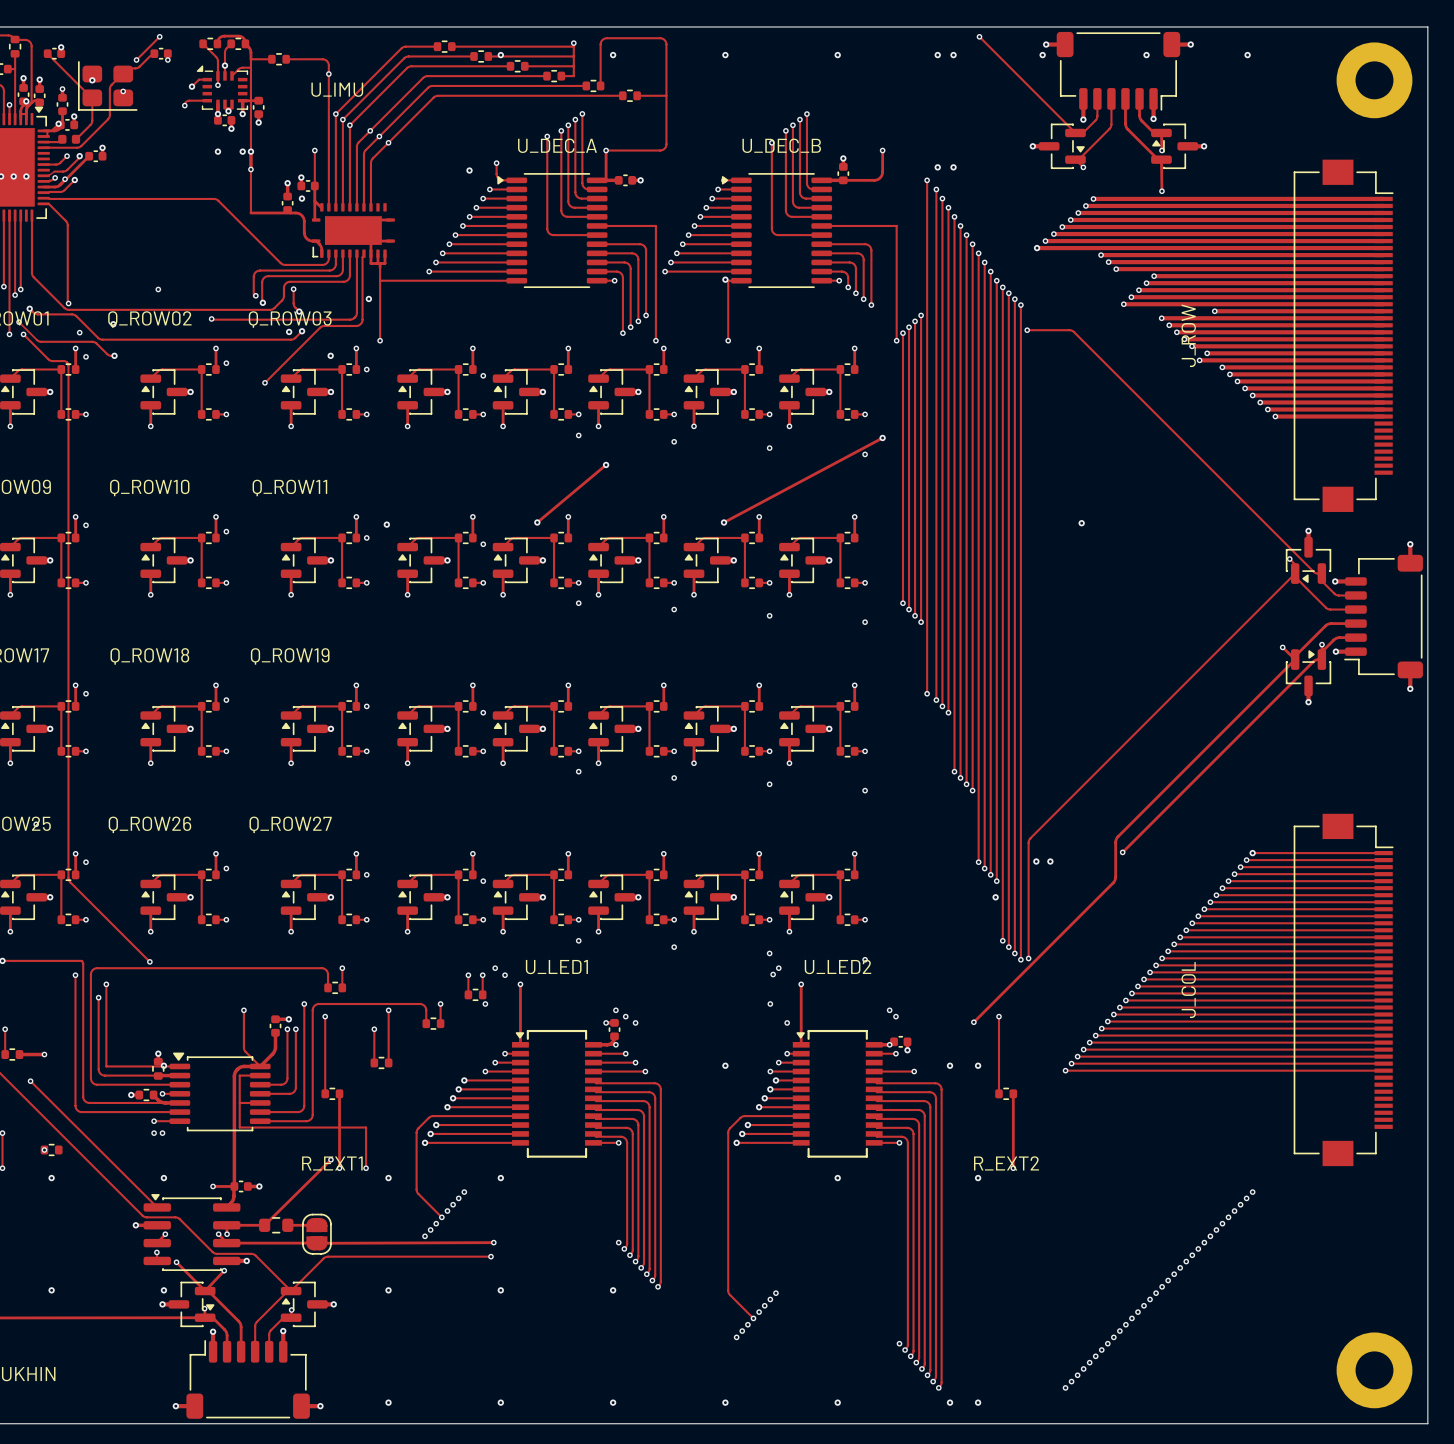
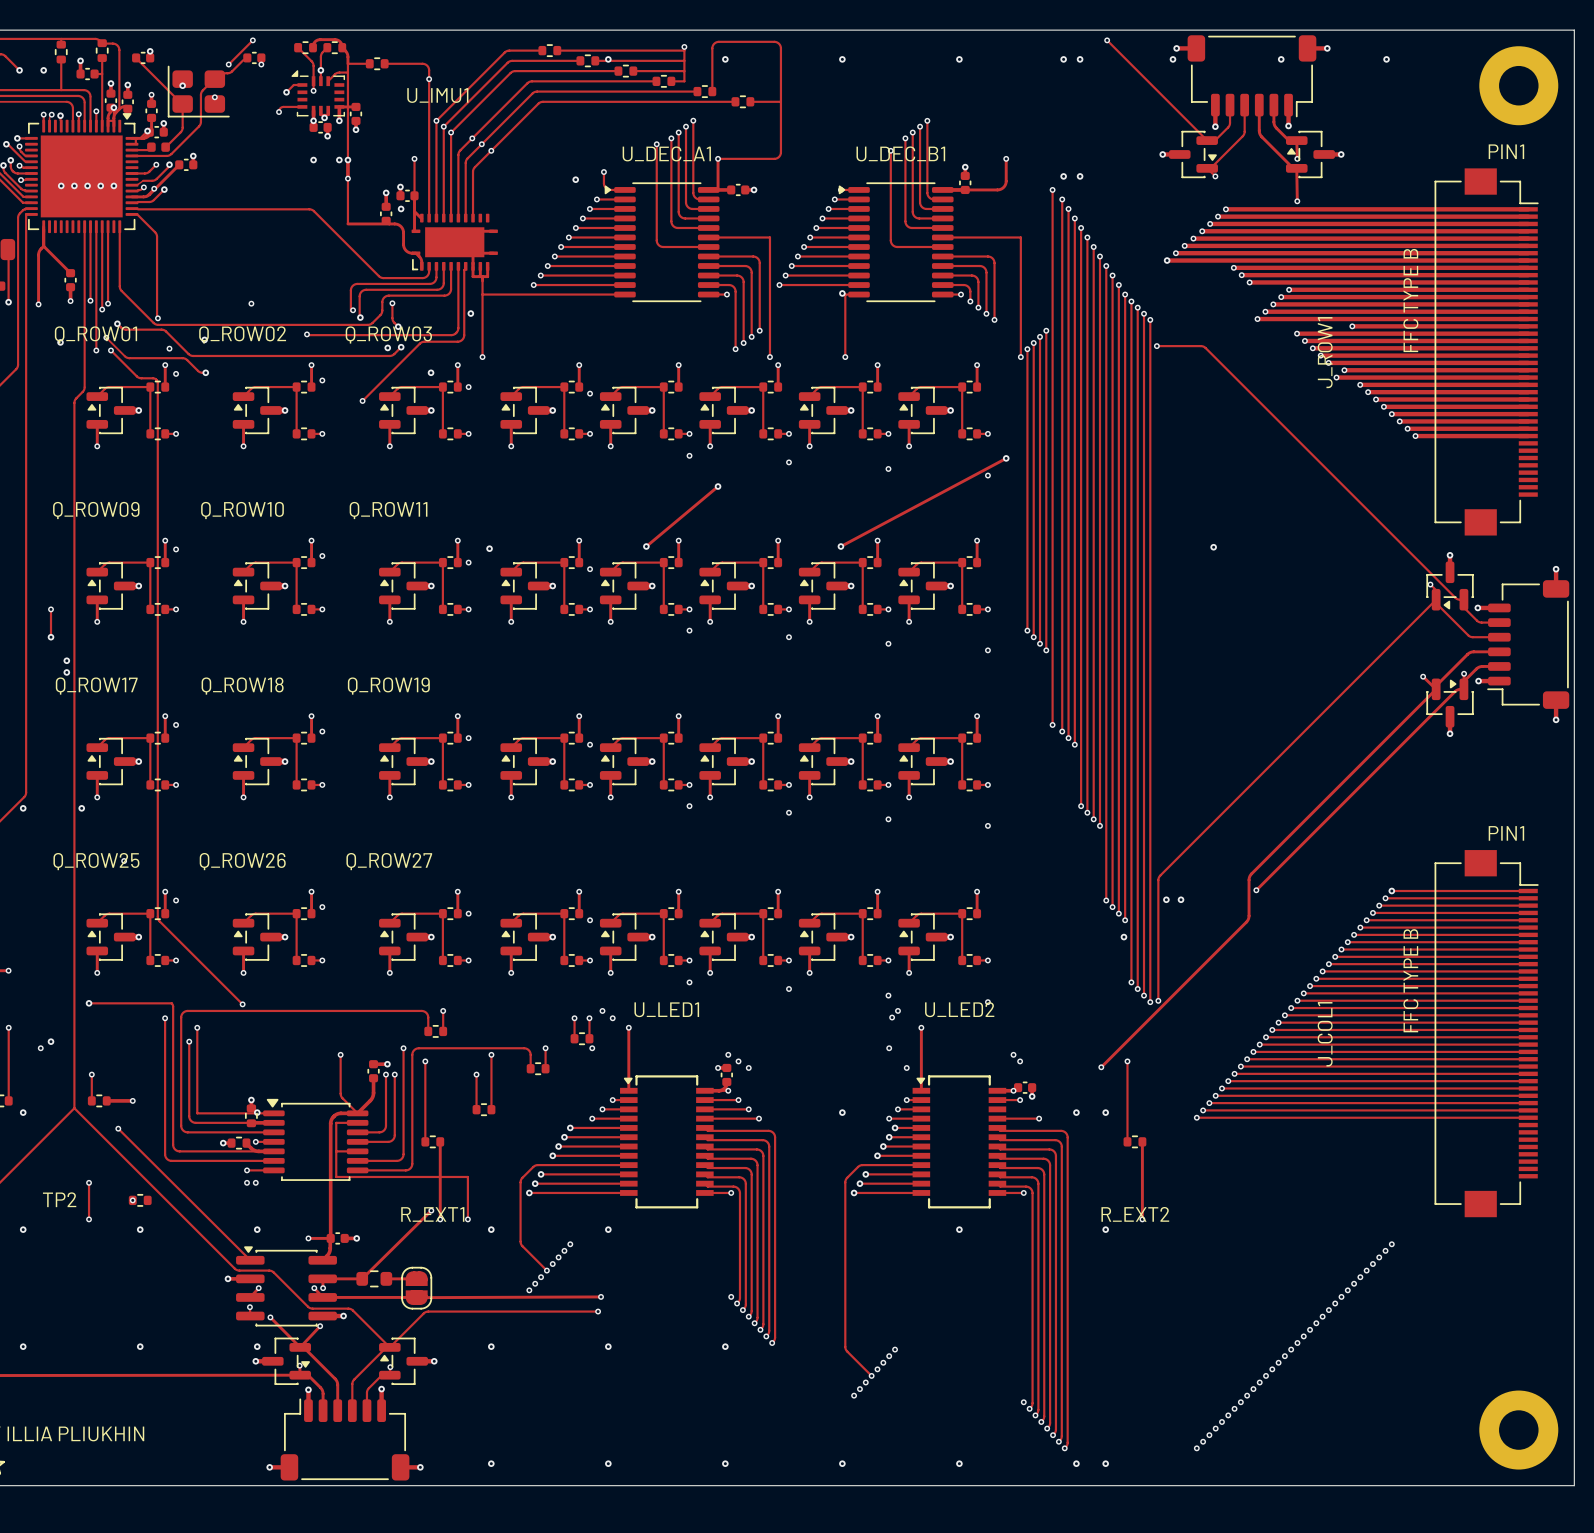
U_IMU name: U_IMU (337, 89) -> U_IMU1 (437, 95)
text: none -> PIN1 (1506, 151)
U_DEC_A name: U_DEC_A (557, 145) -> U_DEC_A1 (666, 153)
U_DEC_B name: U_DEC_B (781, 145) -> U_DEC_B1 (900, 153)
text: none -> FFC TYPE B (1410, 300)
J_ROW name: J_ROW (1188, 335) -> J_ROW1 (1325, 352)
text: none -> PIN1 (1506, 833)
text: none -> FFC TYPE B (1410, 980)
J_COL name: J_COL (1188, 990) -> J_COL1 (1325, 1034)

